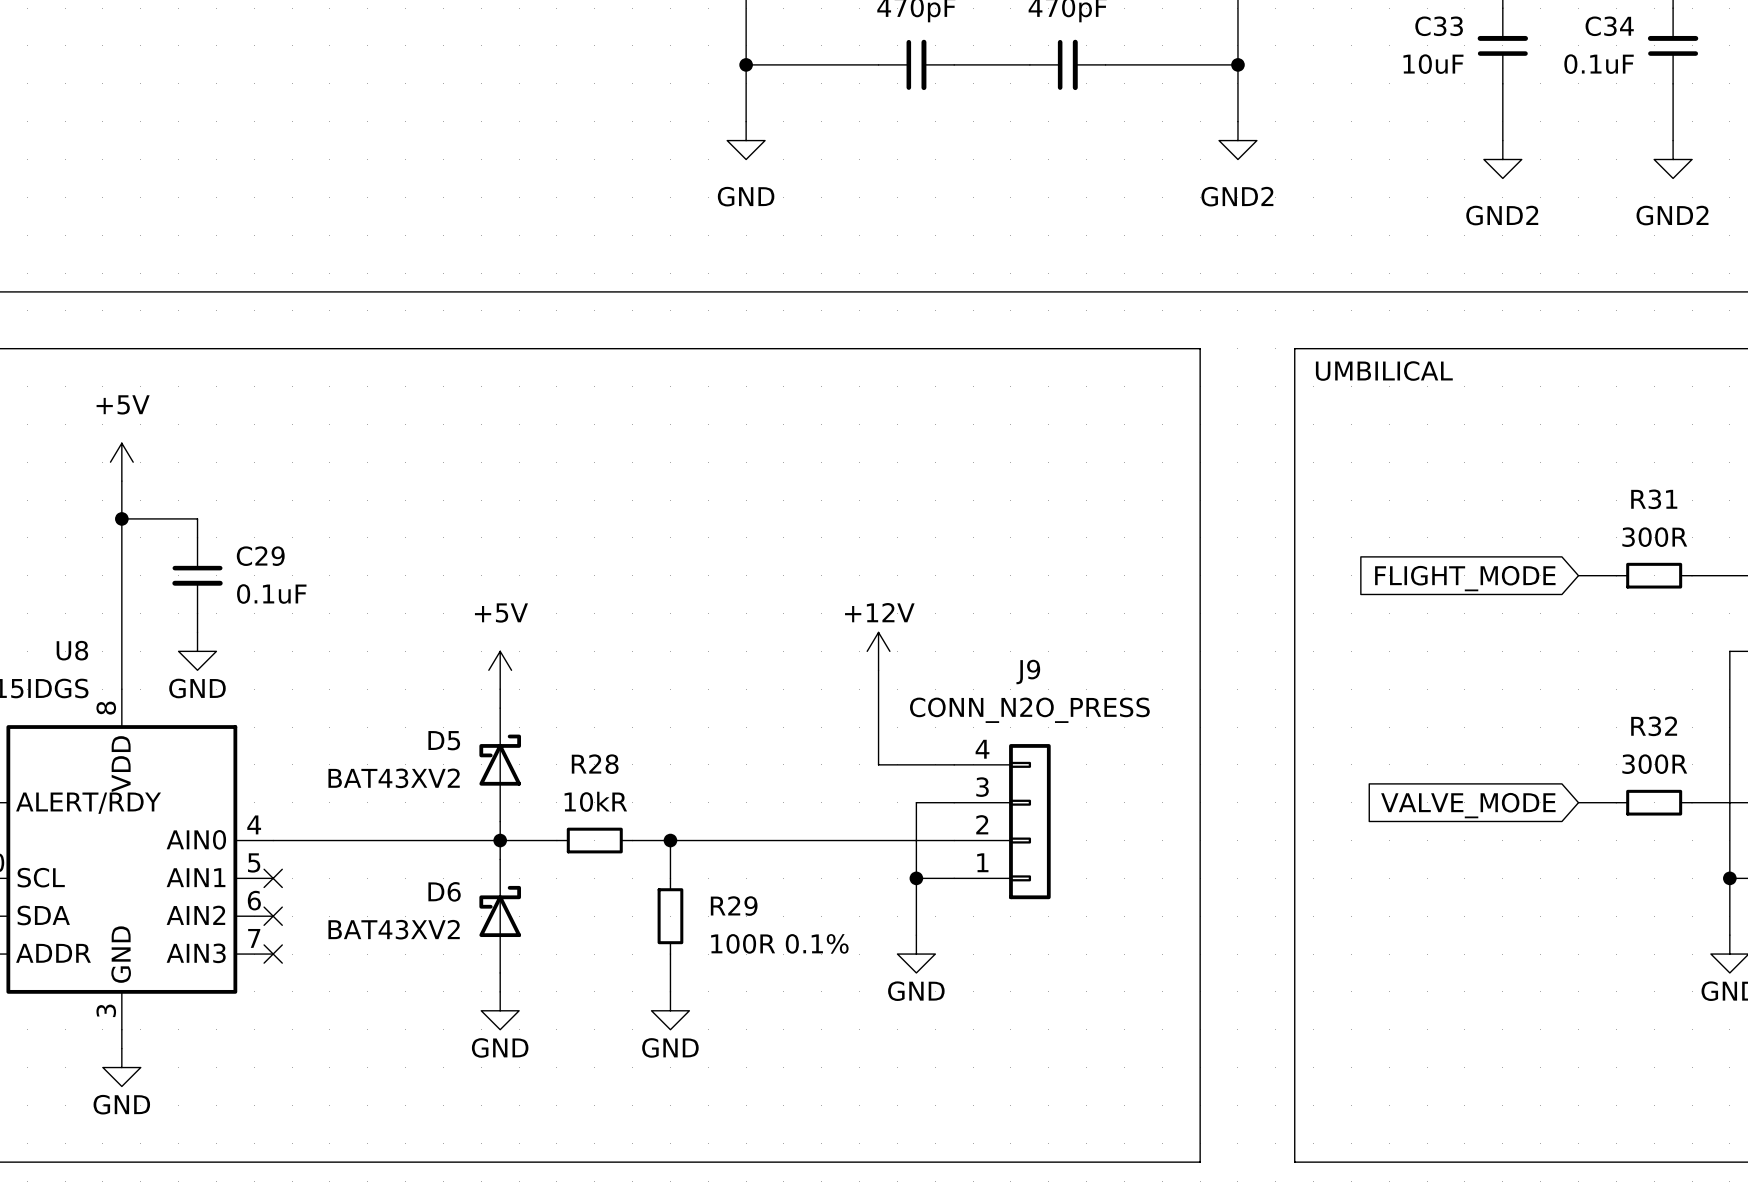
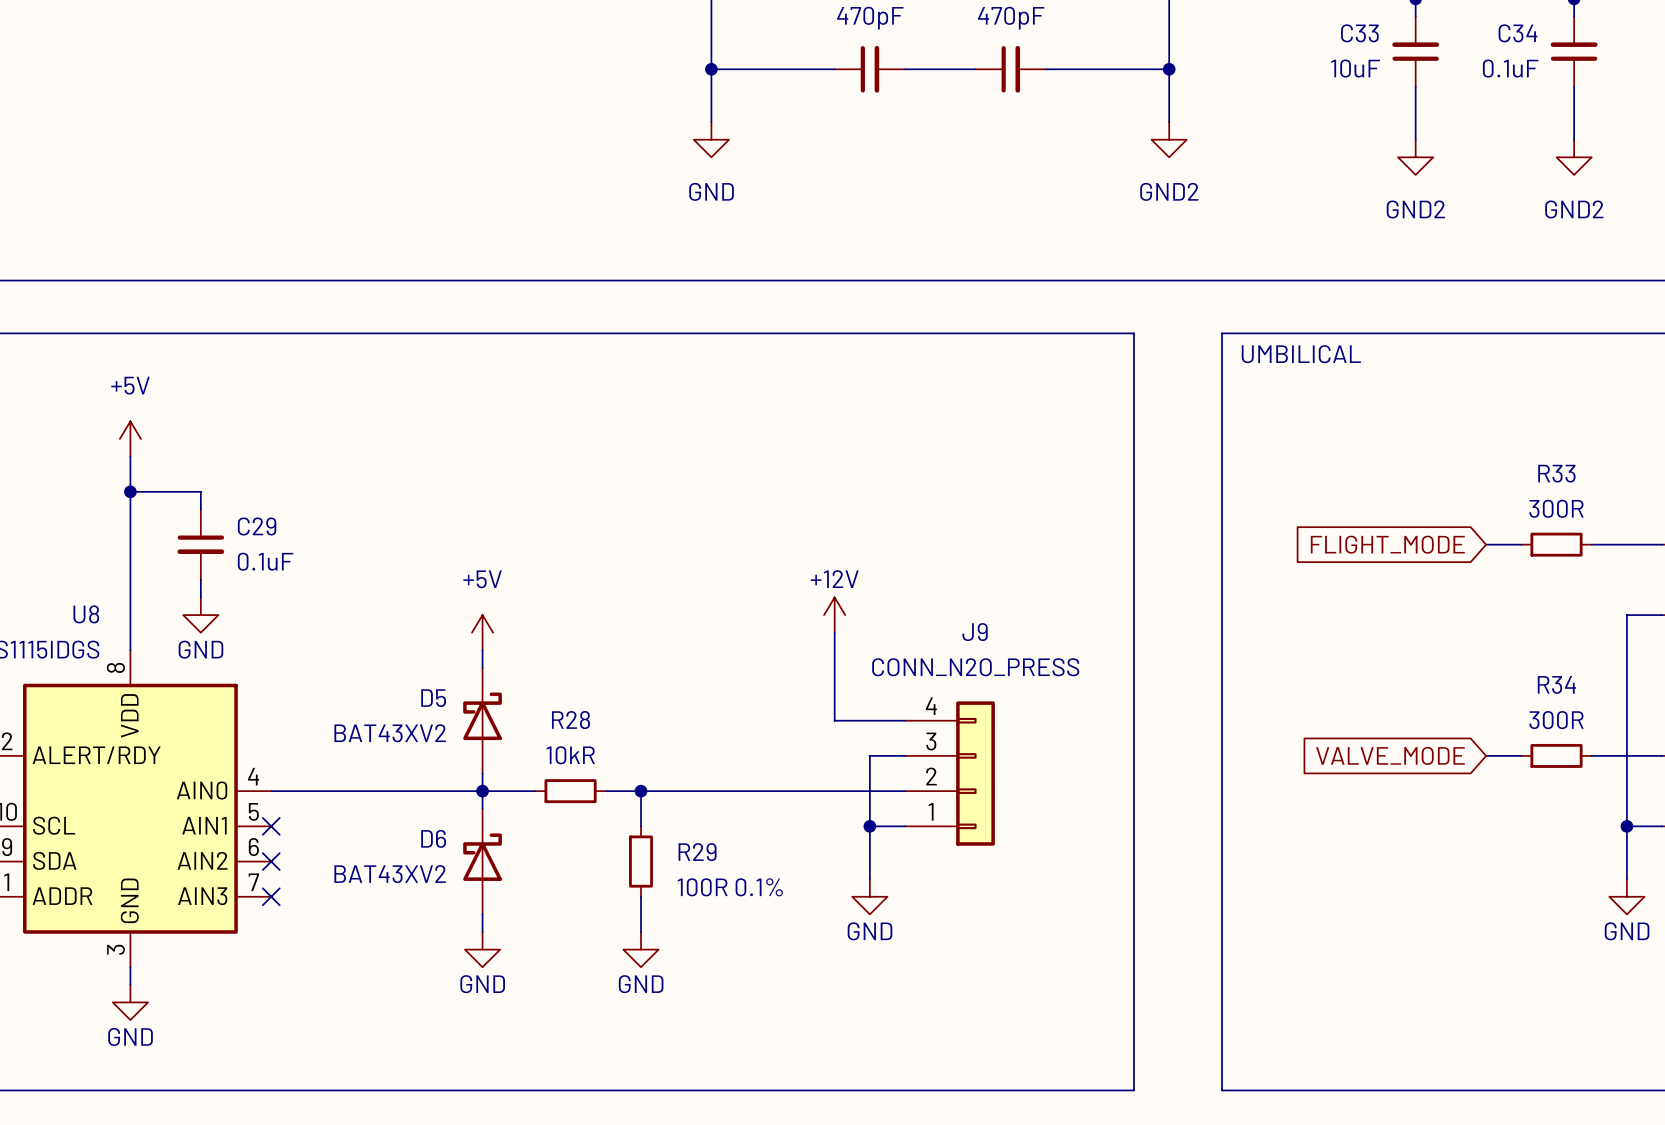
R31 name: R31 (1654, 499) -> R33 (1556, 473)
R32 name: R32 (1654, 726) -> R34 (1556, 684)

